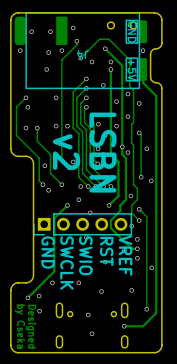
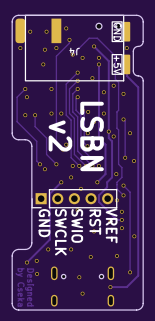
via: (127, 116) -> none
via: (44, 165) -> none

